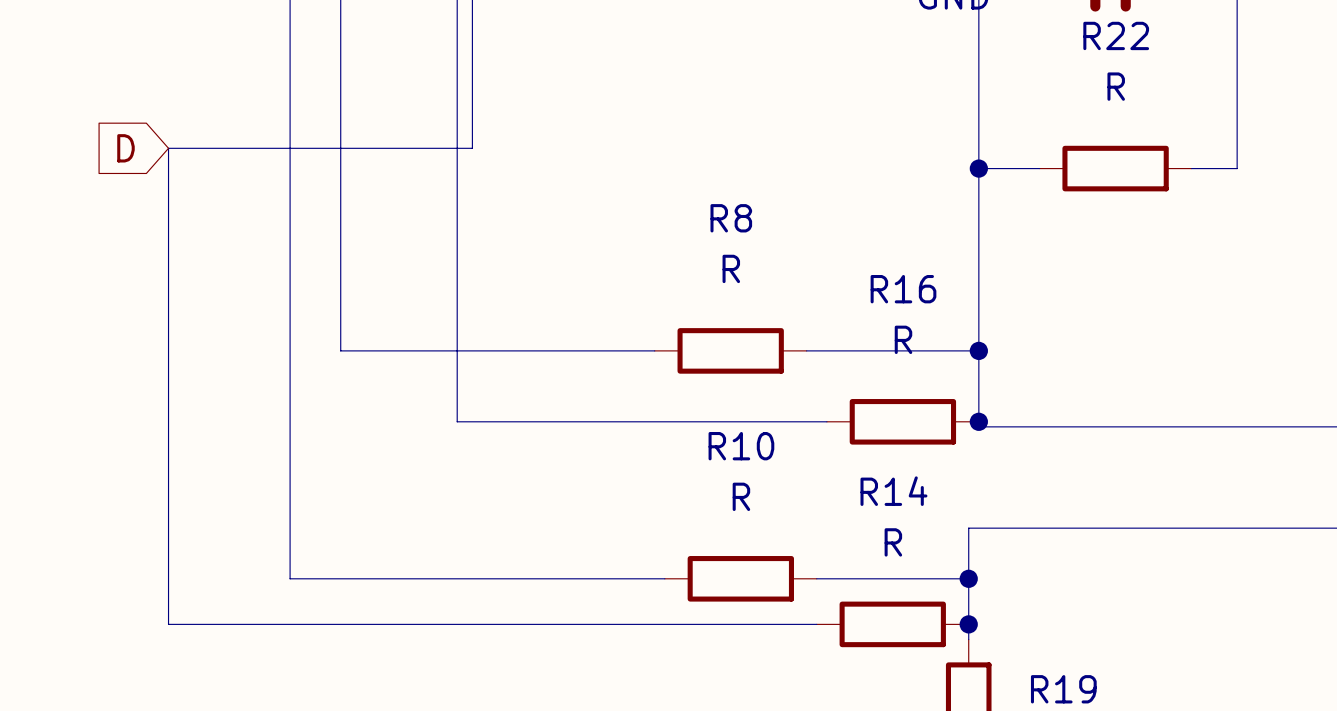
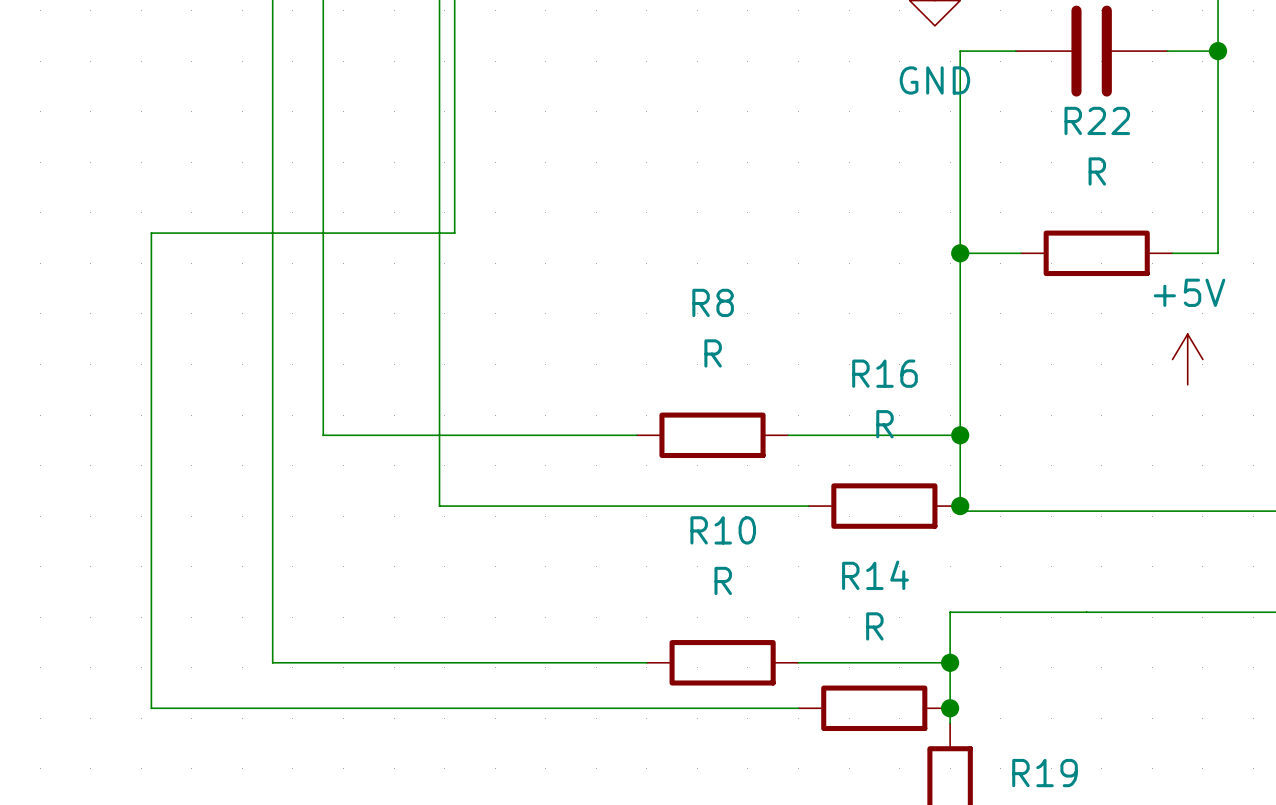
global label: D (125, 148) -> none
power symbol: none -> +5V (1187, 359)

